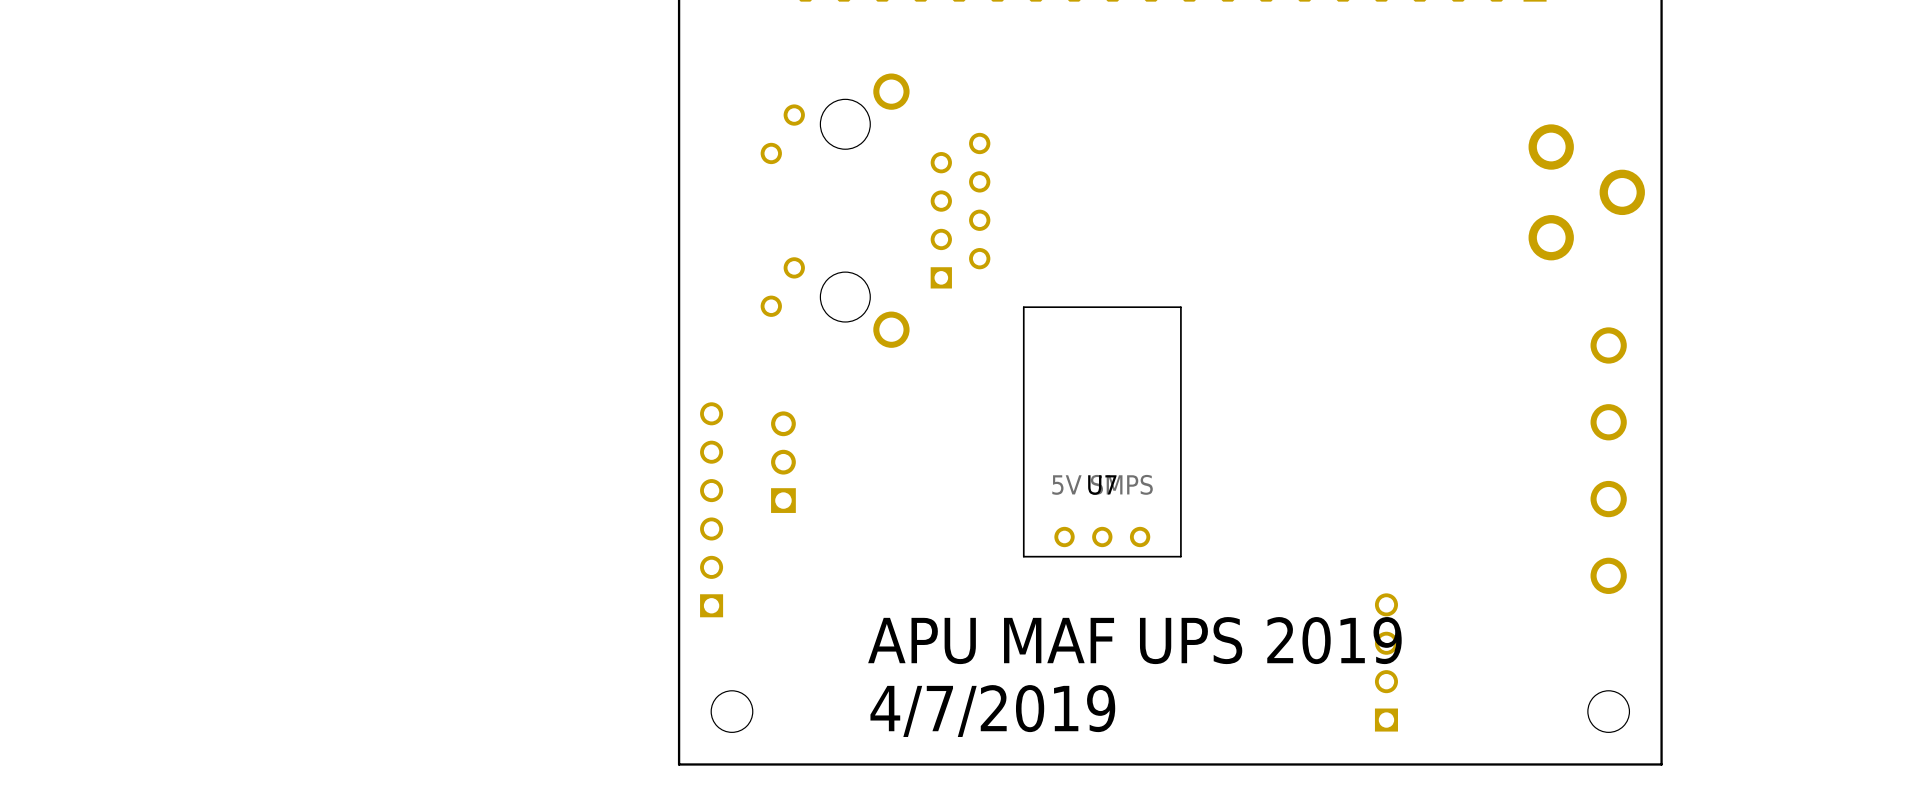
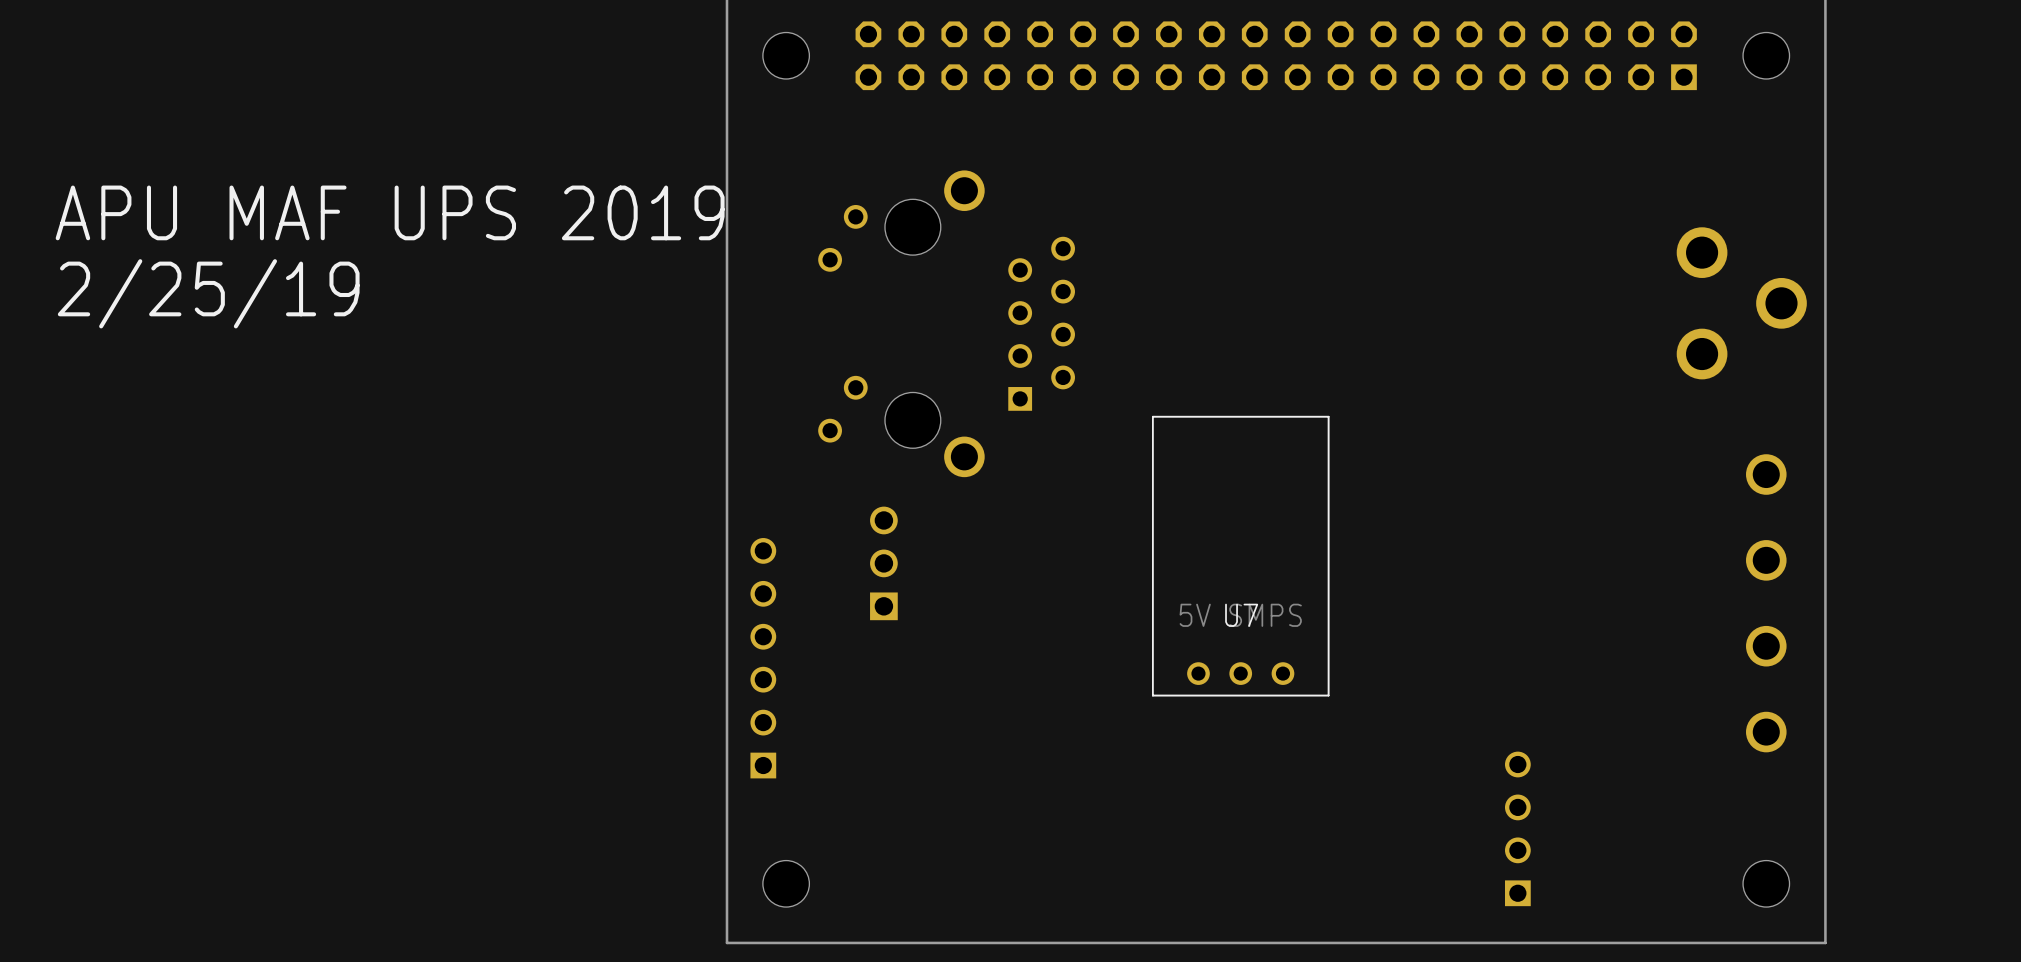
text: none -> APU MAF UPS 2019 (390, 212)
text: none -> 2/25/19 (208, 293)
U7 position: (1102, 431) -> (1240, 556)
part position: (783, 462) -> (883, 563)
text: APU MAF UPS 2019 (1134, 640) -> none
text: 4/7/2019 (992, 711) -> none

